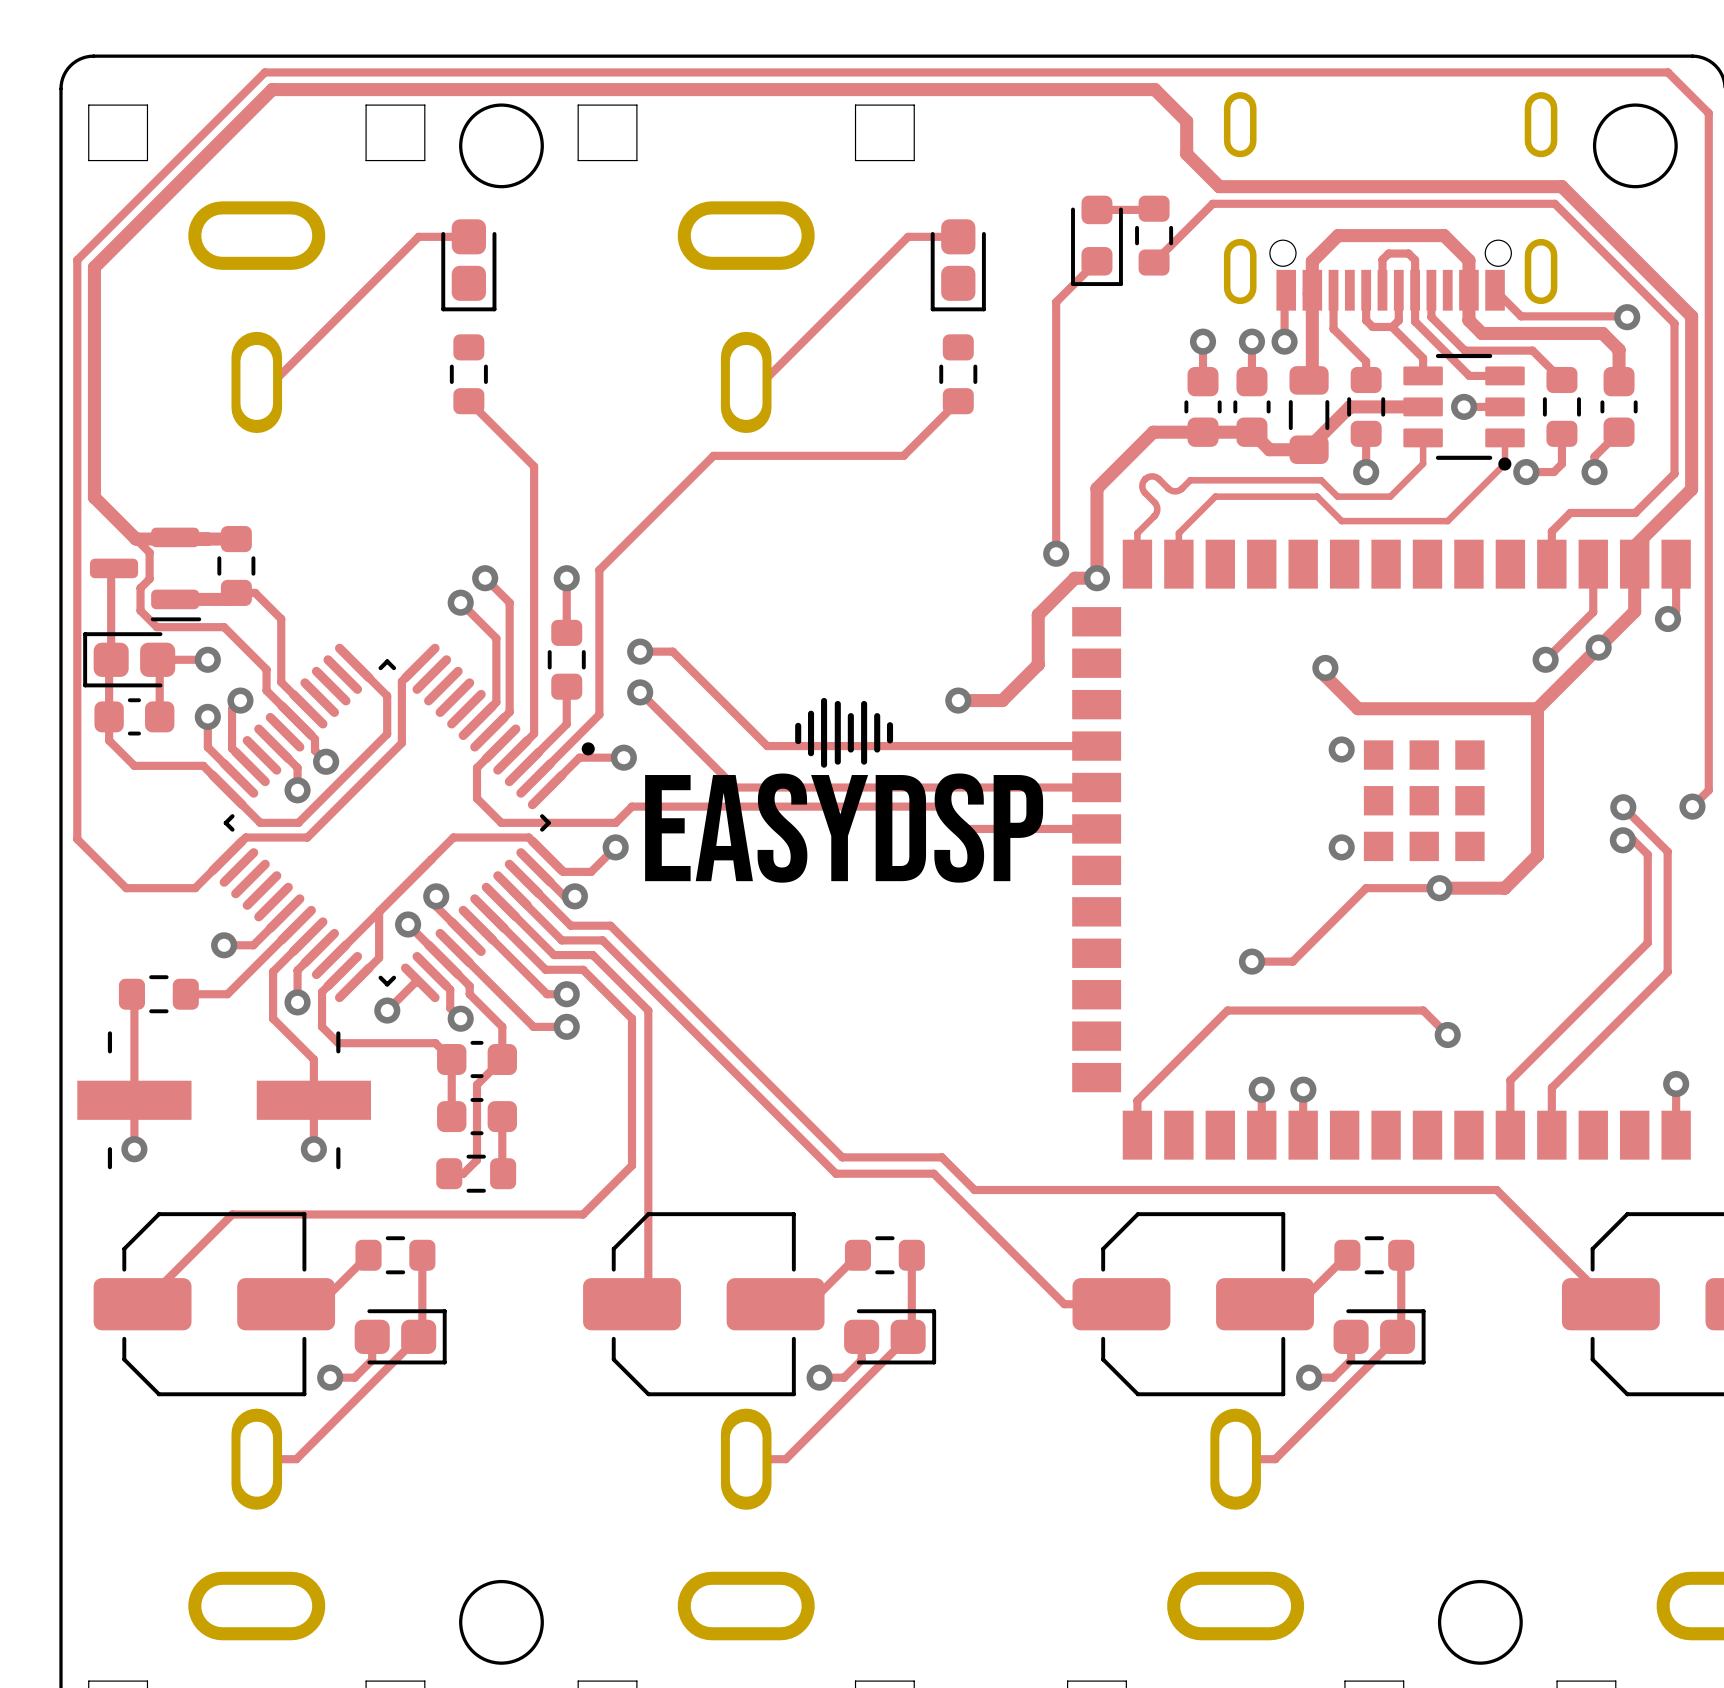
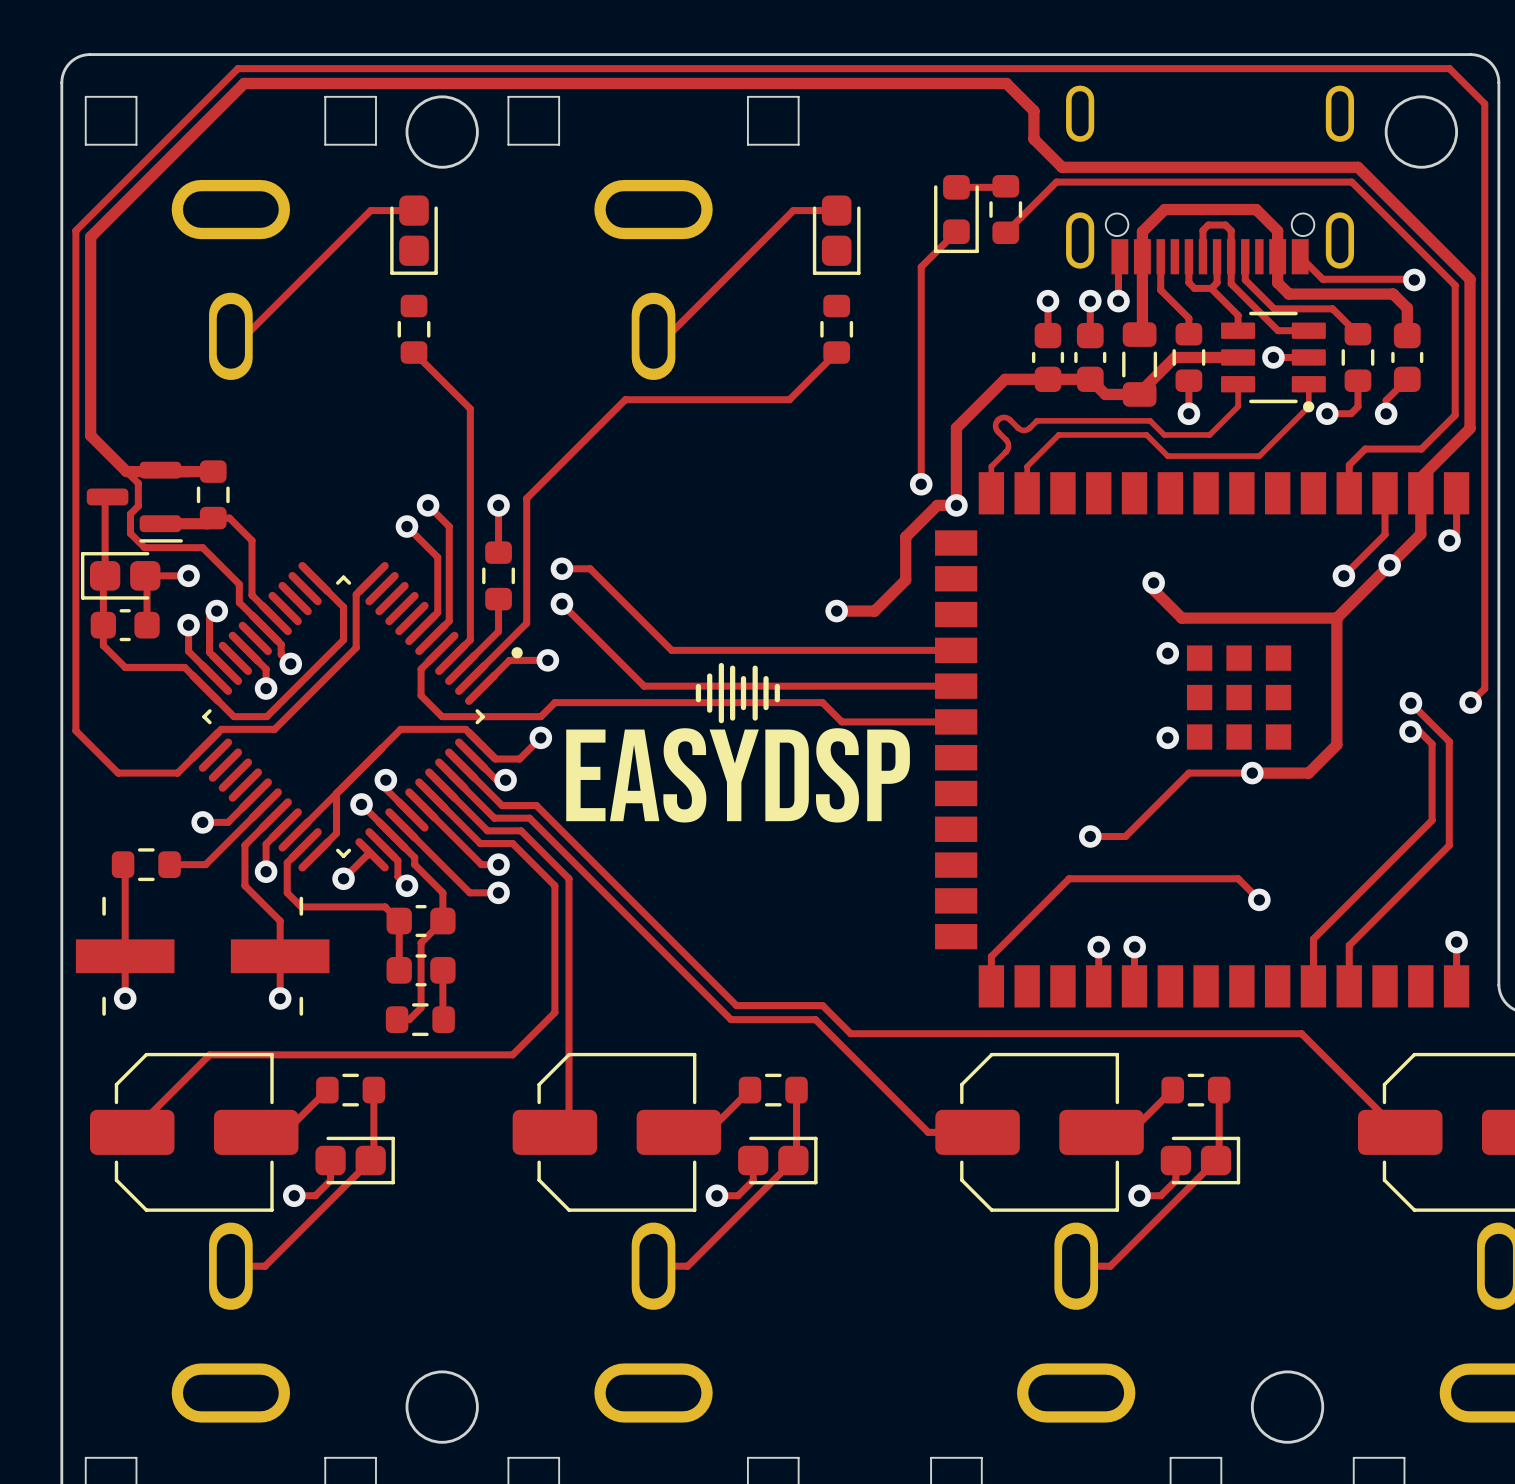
drawing: [645, 697, 1044, 883] -> none
drawing: none -> [566, 662, 910, 823]

